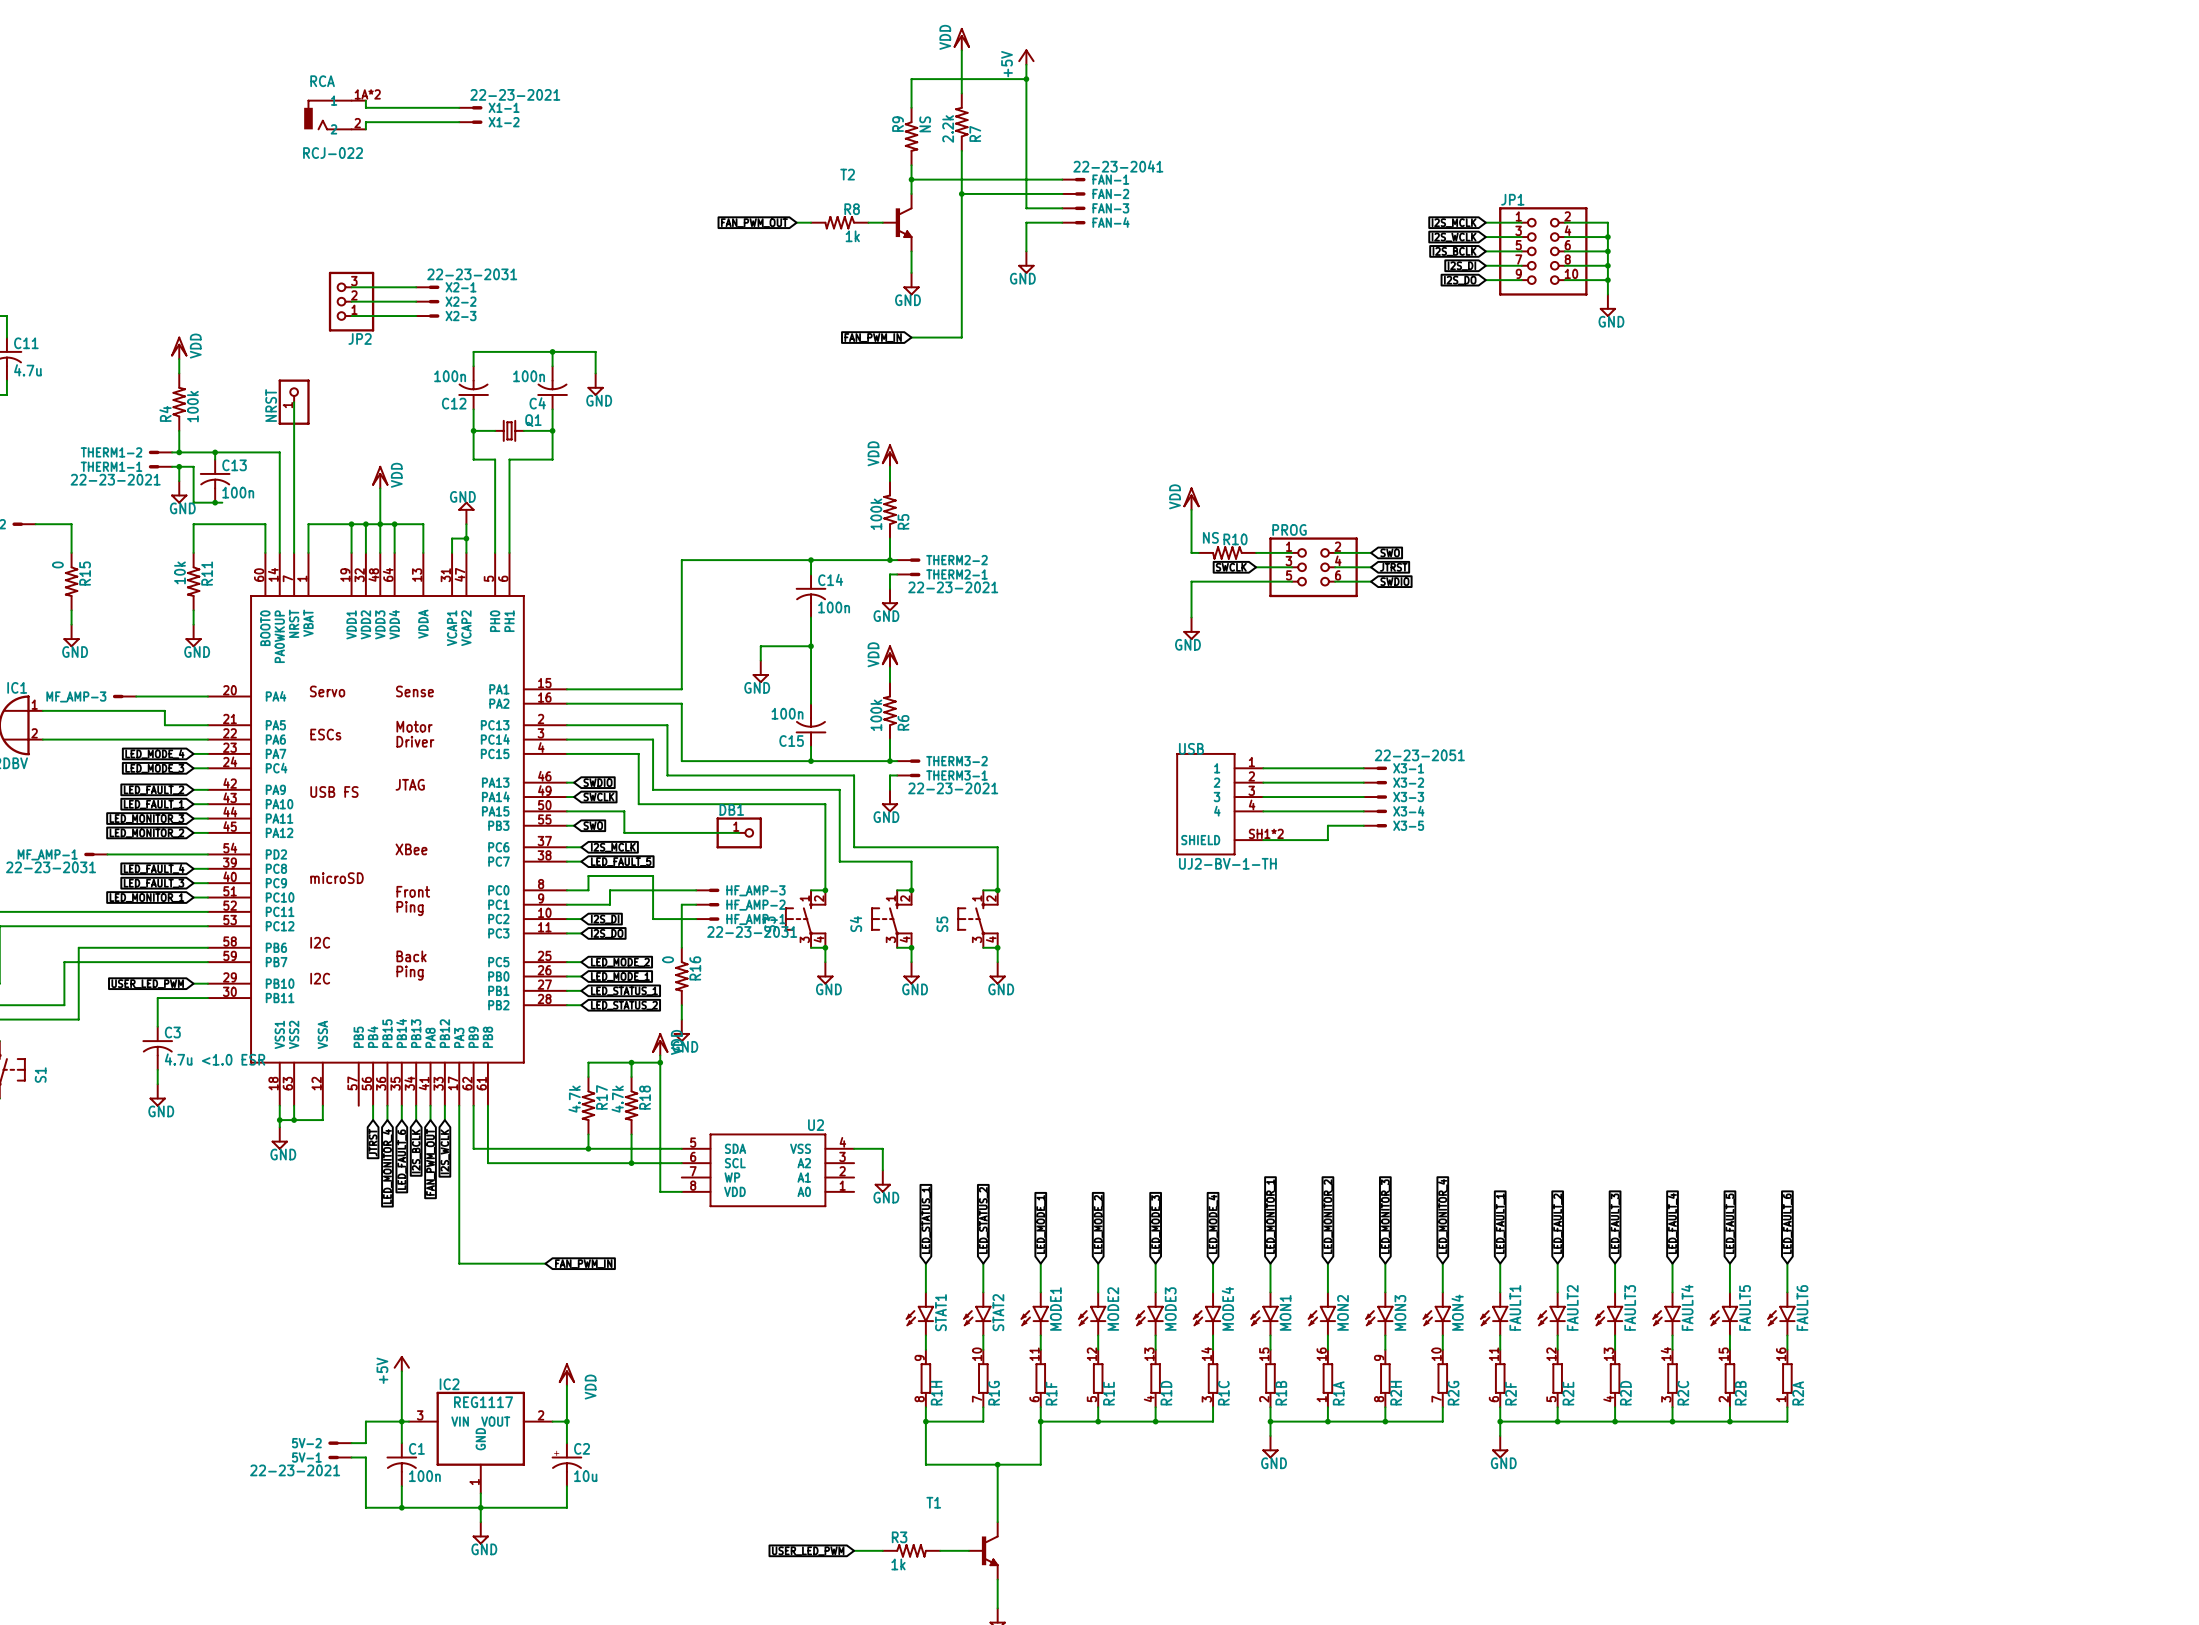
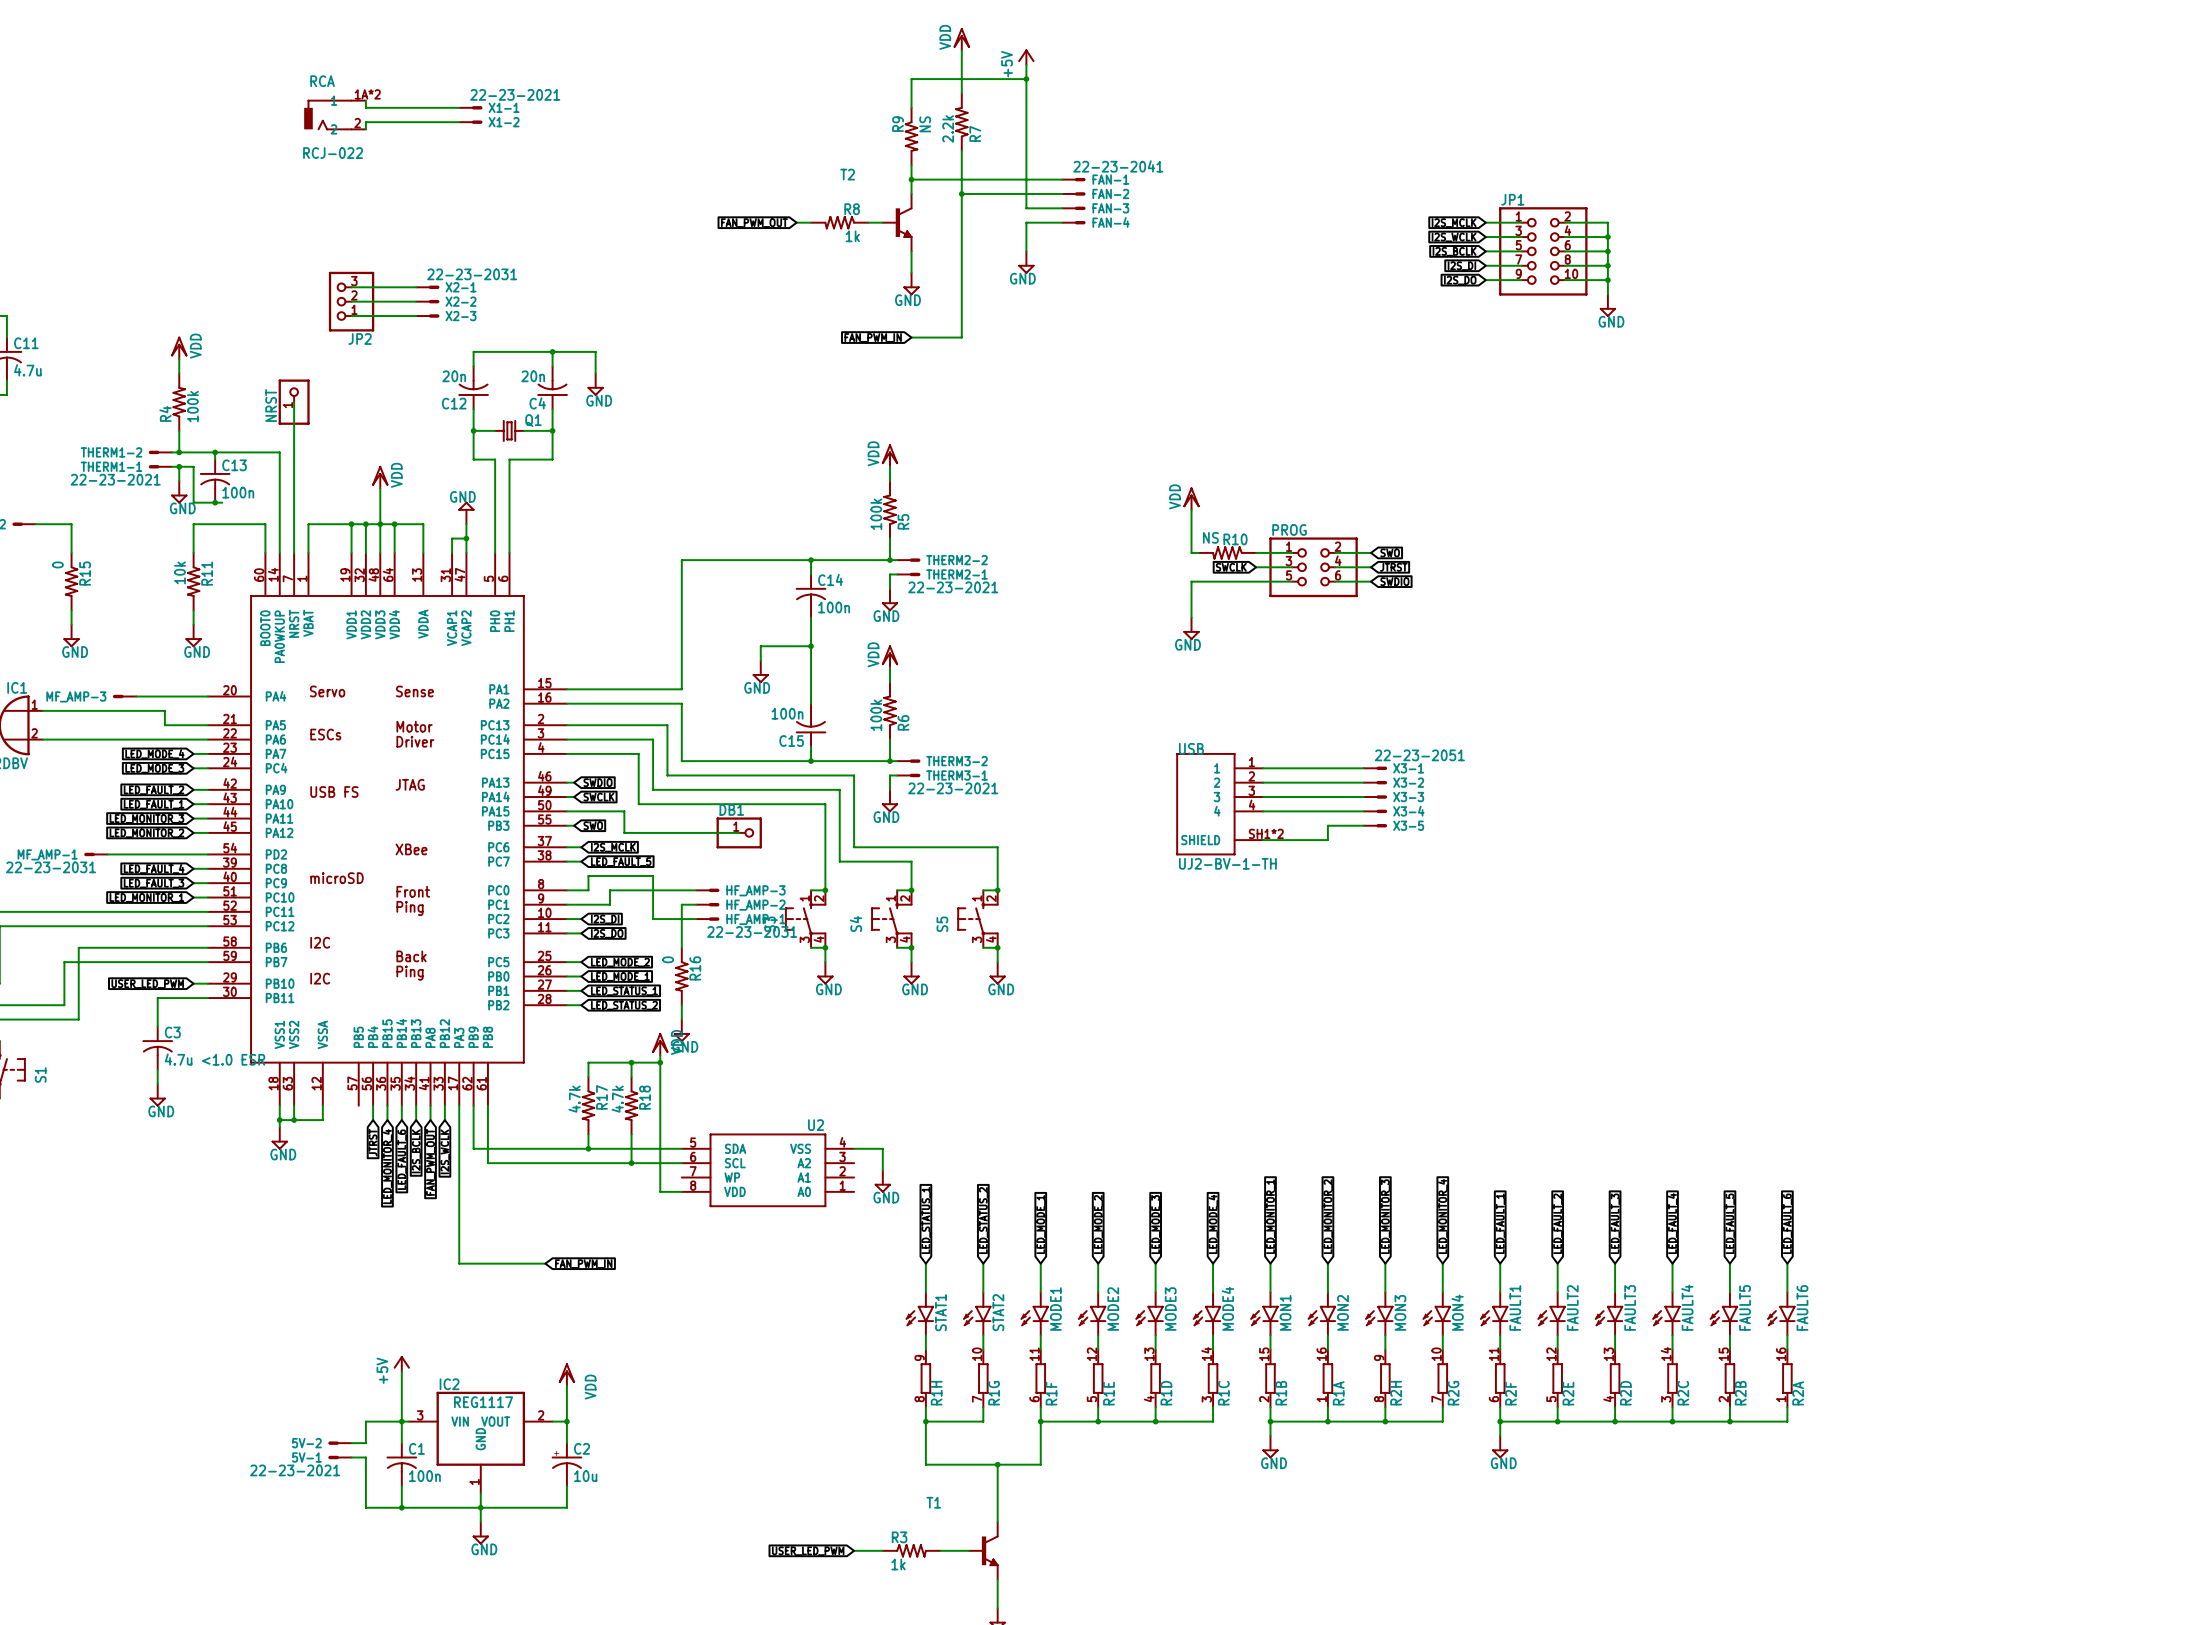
C12 value: 100n (450, 376) -> 20n (454, 376)
C4 value: 100n (529, 376) -> 20n (533, 376)

